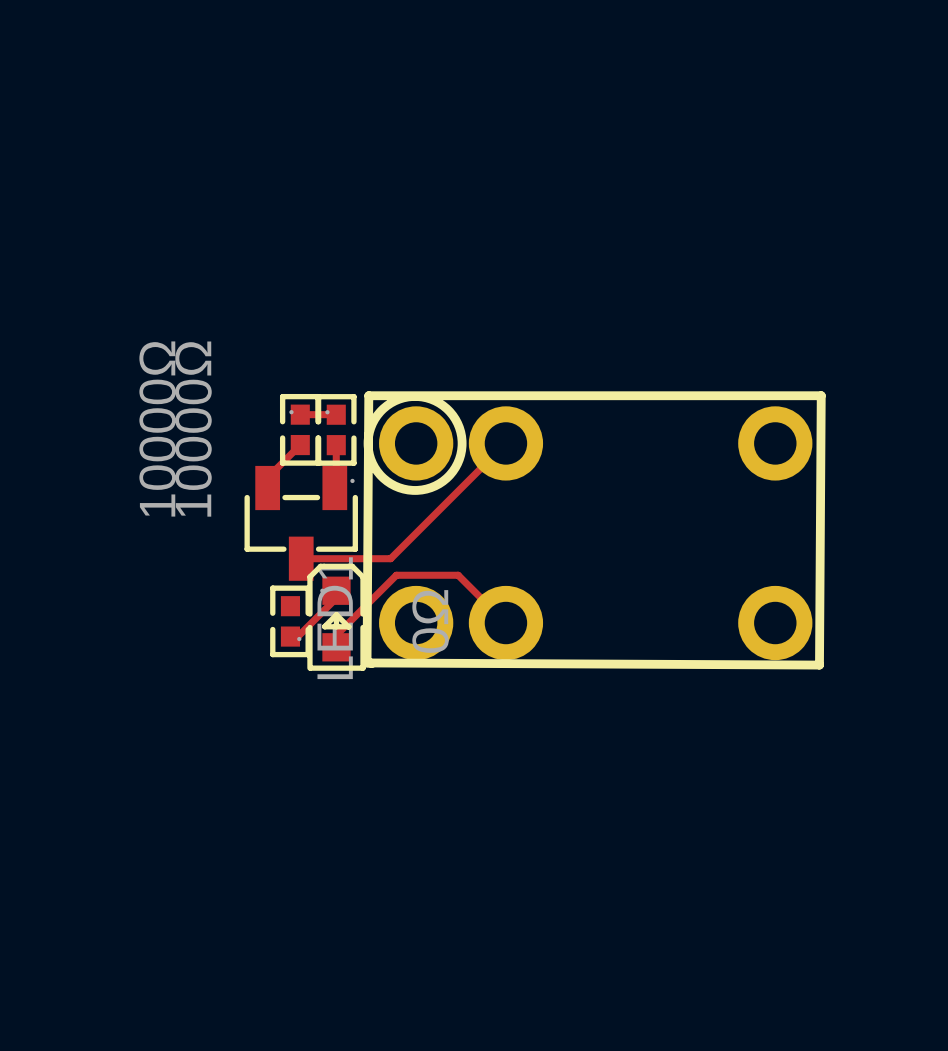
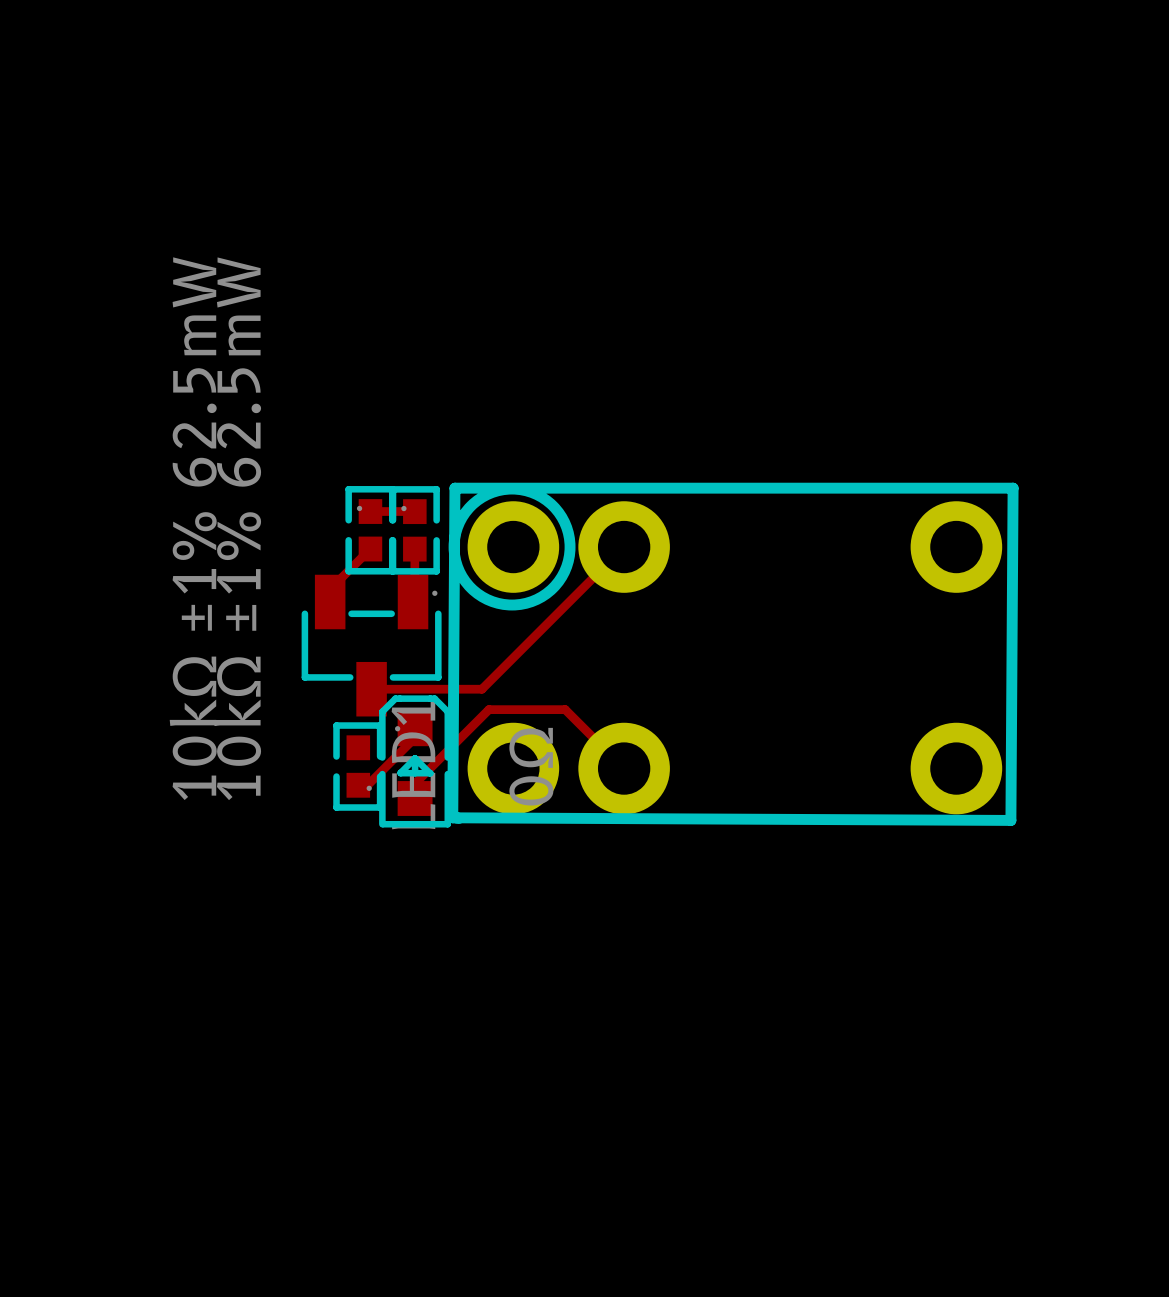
part value: 10000Ω (157, 429) -> 10kΩ ±1% 62.5mW (193, 528)
part value: 10000Ω (193, 429) -> 10kΩ ±1% 62.5mW (237, 528)

